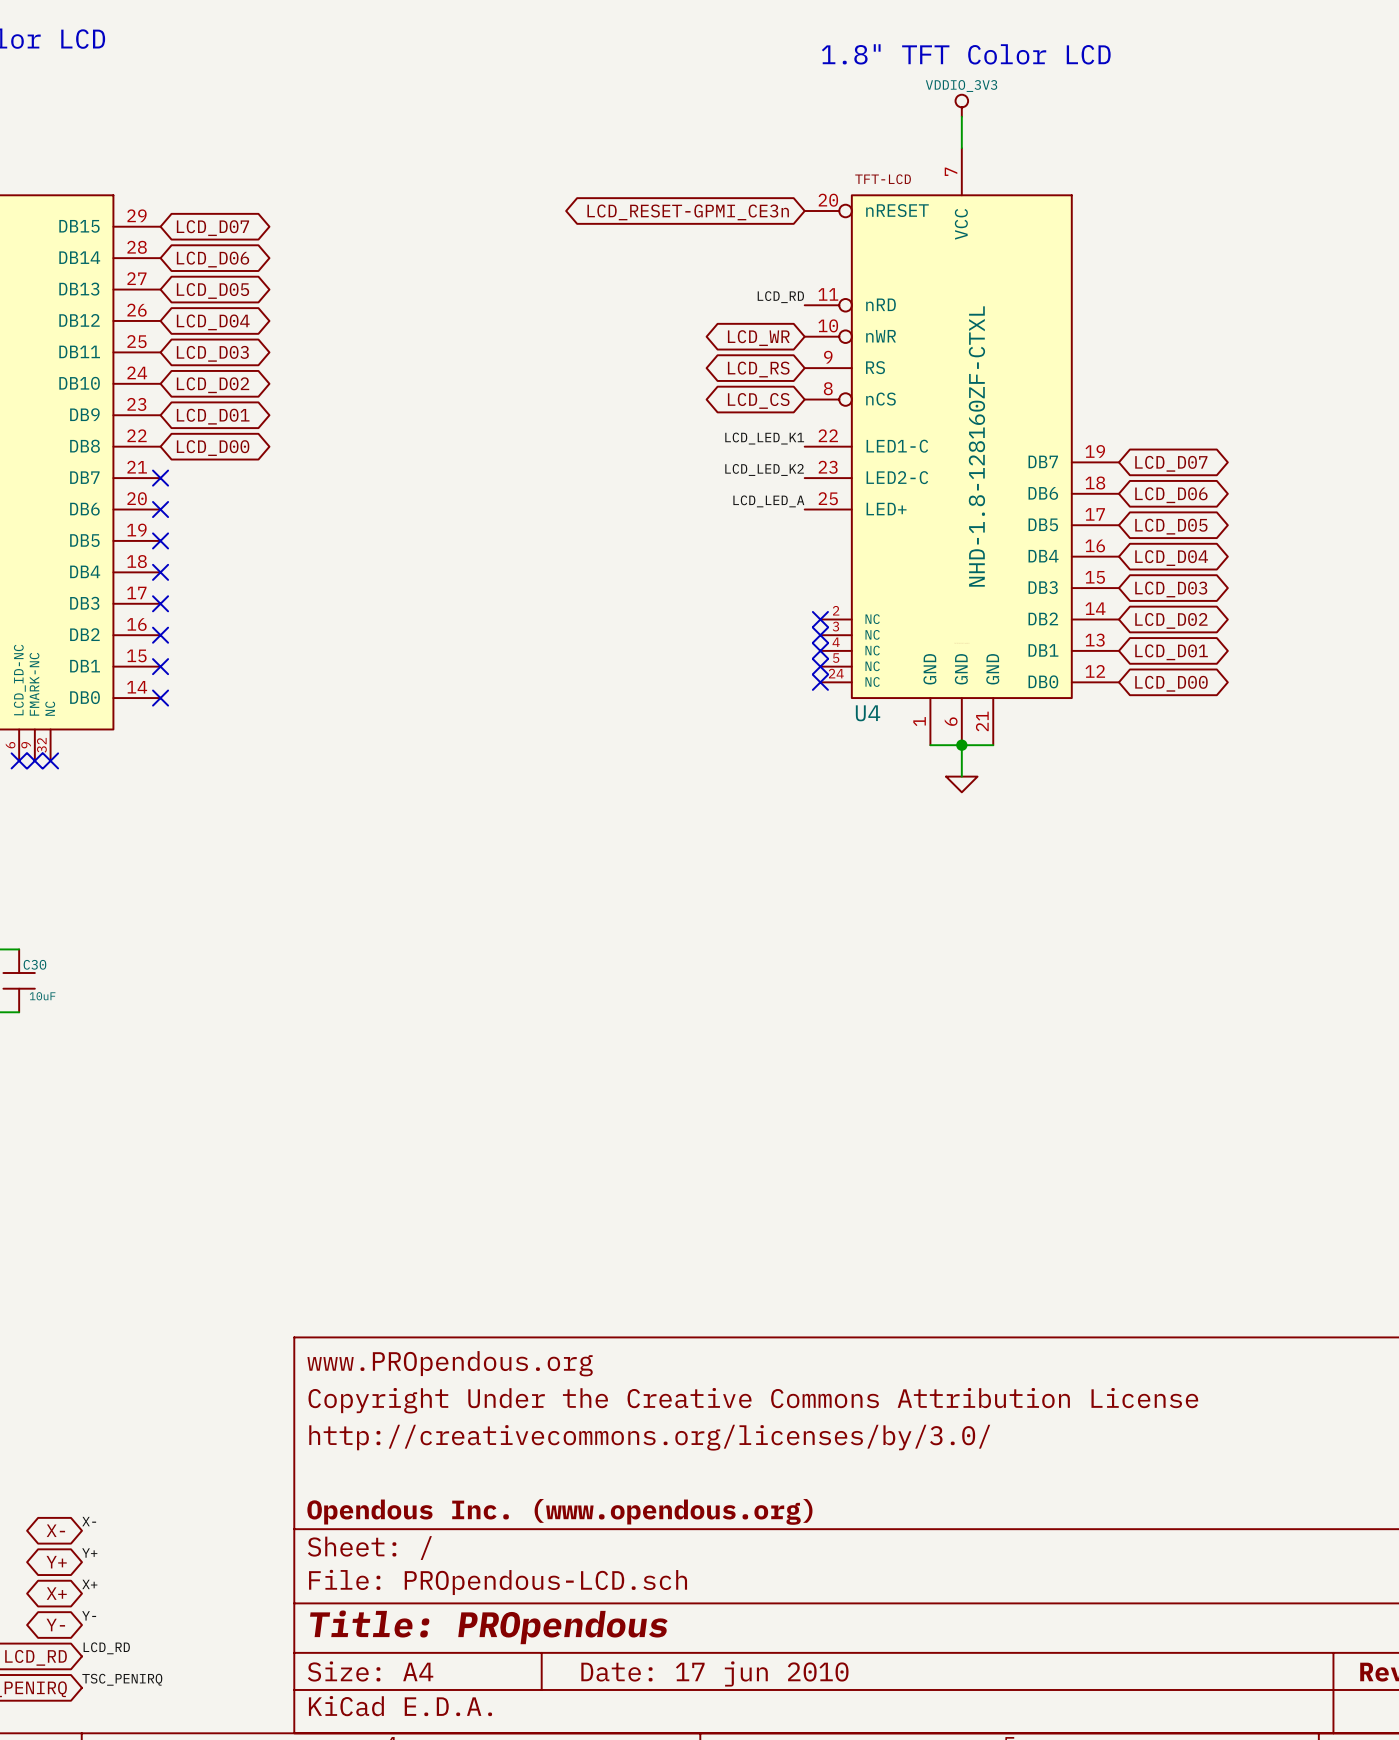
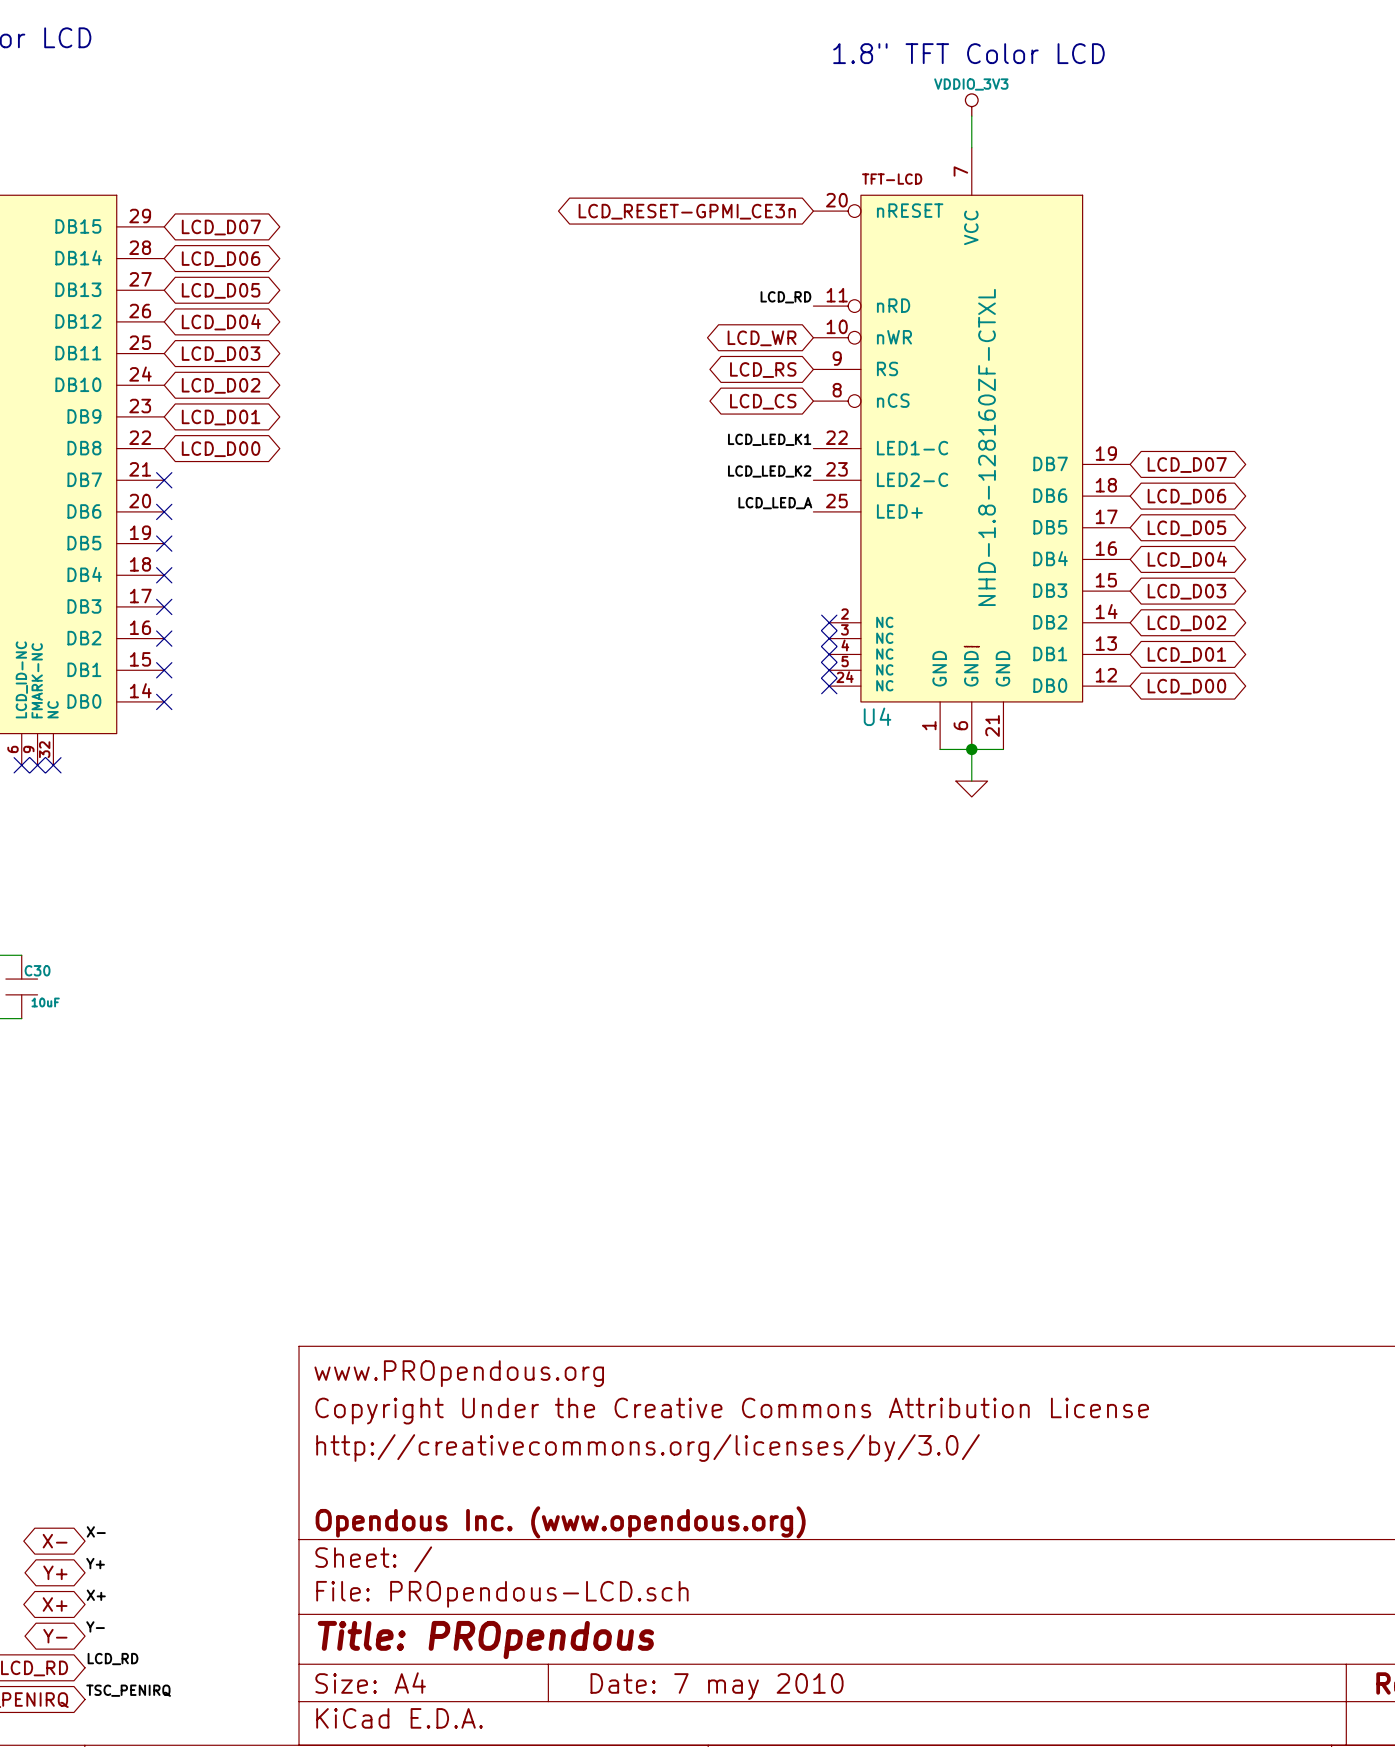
title block: Date: 17 jun 2010 (714, 1673) -> Date: 7 may 2010 (717, 1686)

